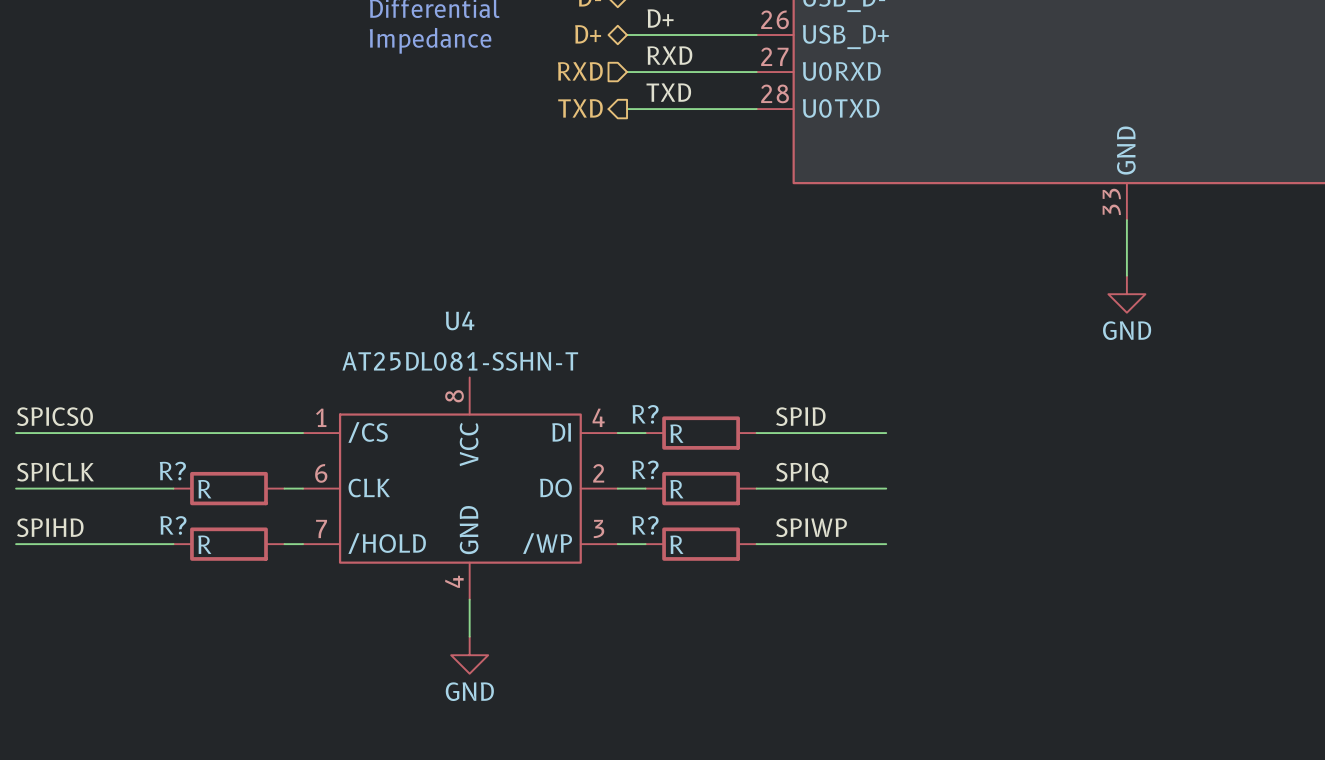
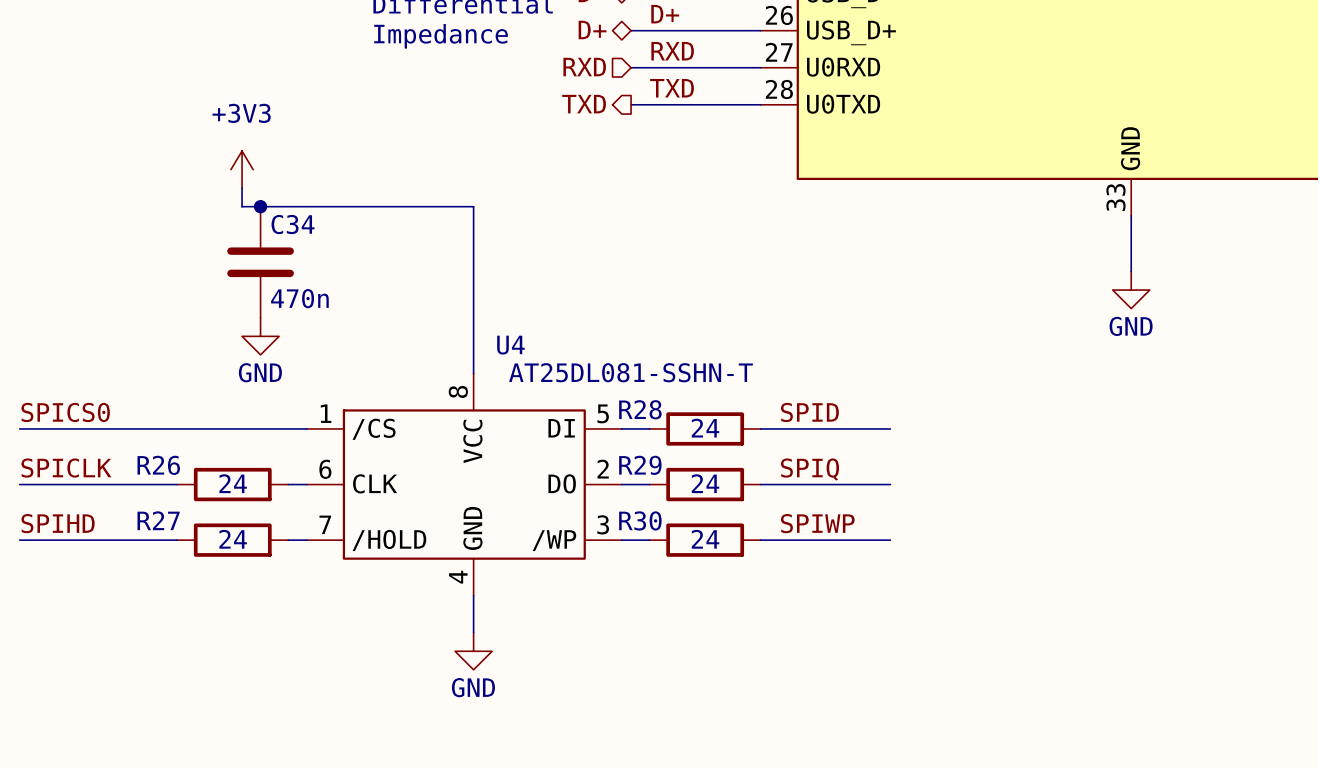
power symbol: none -> +3V3 (242, 169)
wire: none -> (242, 188) (242, 206) (473, 206) (473, 373)
junction: none -> (260, 206)
C34: none -> 470n (260, 262)
U4 name position: U4 (460, 320) -> U4 (510, 345)
power symbol: none -> GND (260, 336)
U4 value position: AT25DL081-SSHN-T (460, 361) -> AT25DL081-SSHN-T (631, 372)
R? name: R? (645, 414) -> R28 (640, 409)
U4 pin number: 4 (598, 417) -> 5 (603, 413)
R? value: R (676, 433) -> 24 (705, 428)
R? name: R? (645, 469) -> R29 (640, 465)
R? name: R? (172, 471) -> R26 (158, 465)
R? value: R (204, 489) -> 24 (233, 483)
R? value: R (676, 489) -> 24 (705, 483)
R? name: R? (173, 525) -> R27 (158, 520)
R? name: R? (645, 525) -> R30 (640, 520)
R? value: R (204, 544) -> 24 (233, 539)
R? value: R (676, 544) -> 24 (705, 539)

